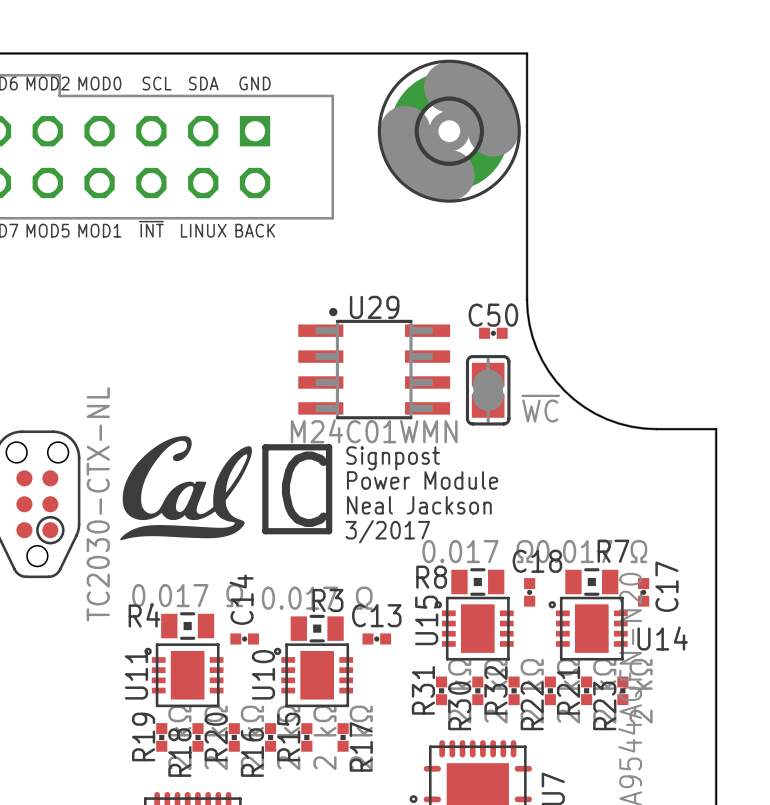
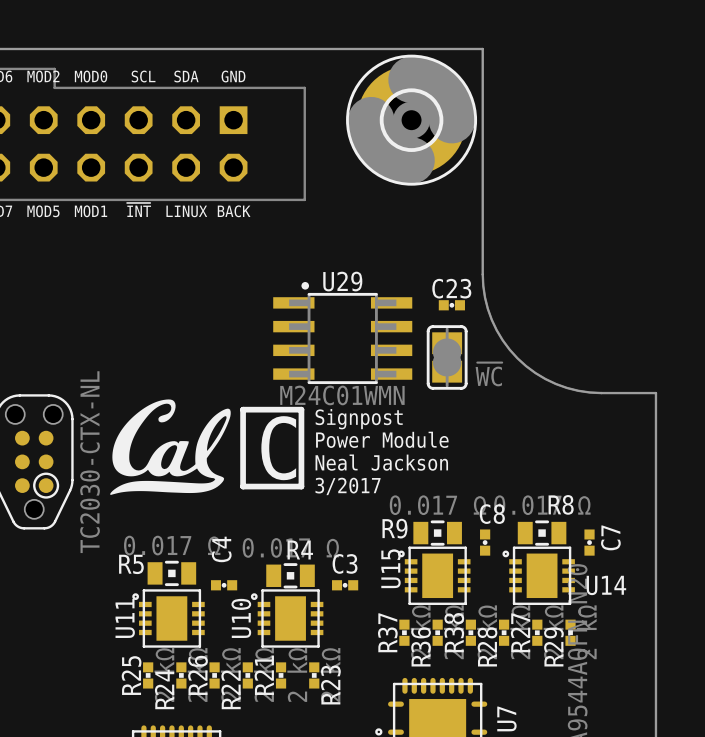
C50 name: C50 (493, 315) -> C23 (451, 288)
R7 name: R7 (613, 551) -> R8 (561, 504)
C18 name: C18 (537, 561) -> C8 (492, 514)
R8 name: R8 (431, 577) -> R9 (394, 528)
C17 name: C17 (666, 586) -> C7 (610, 537)
C14 name: C14 (241, 599) -> C4 (221, 549)
R3 name: R3 (328, 600) -> R4 (300, 549)
R4 name: R4 (144, 615) -> R5 (131, 564)
C13 name: C13 (376, 615) -> C3 (345, 563)
R31 name: R31 (423, 690) -> R37 (387, 632)
R32 name: R32 (495, 690) -> R38 (454, 632)
R21 name: R21 (568, 690) -> R27 (520, 632)
R30 name: R30 (459, 705) -> R36 (421, 646)
R22 name: R22 (532, 705) -> R28 (487, 646)
R23 name: R23 (604, 705) -> R29 (553, 646)
R19 name: R19 (143, 737) -> R25 (131, 675)
R20 name: R20 (216, 737) -> R26 (198, 675)
R15 name: R15 (288, 737) -> R21 (264, 675)
R17 name: R17 (361, 746) -> R23 (330, 685)
R18 name: R18 (179, 752) -> R24 (164, 689)
R16 name: R16 (252, 752) -> R22 (231, 689)

